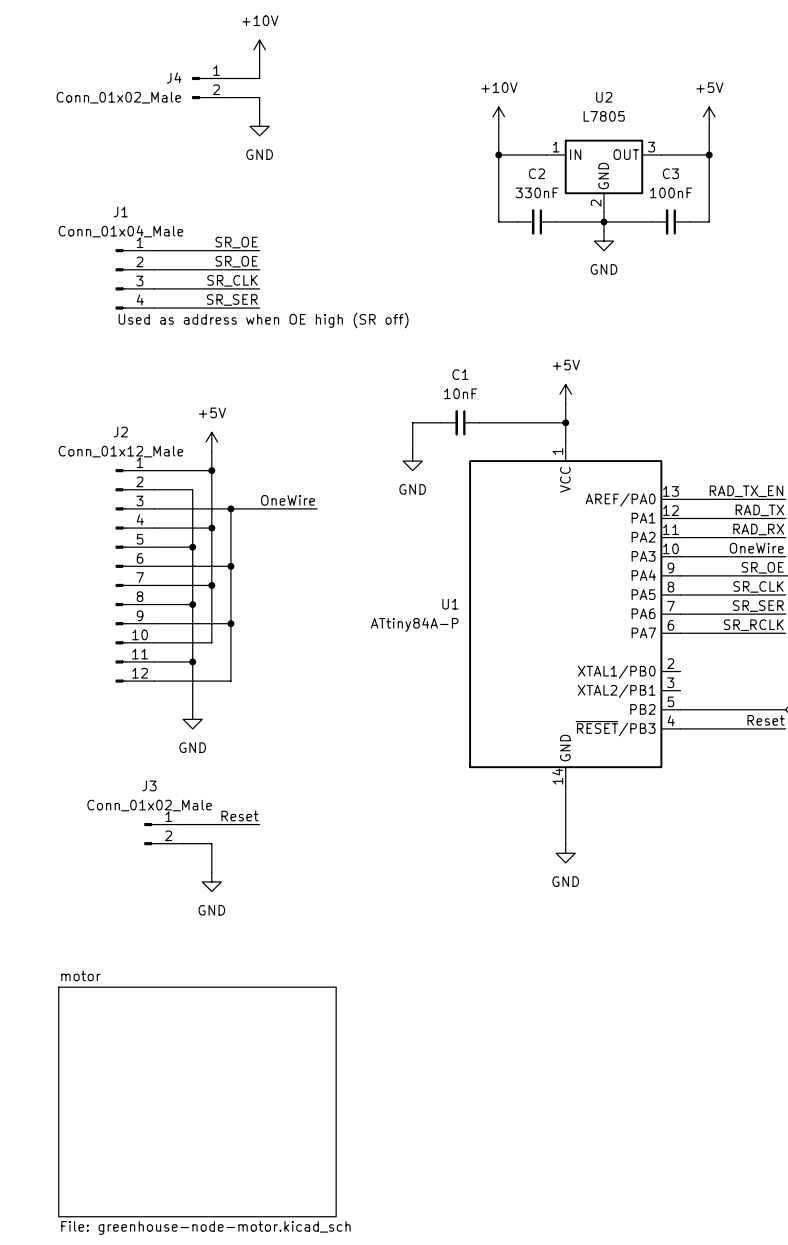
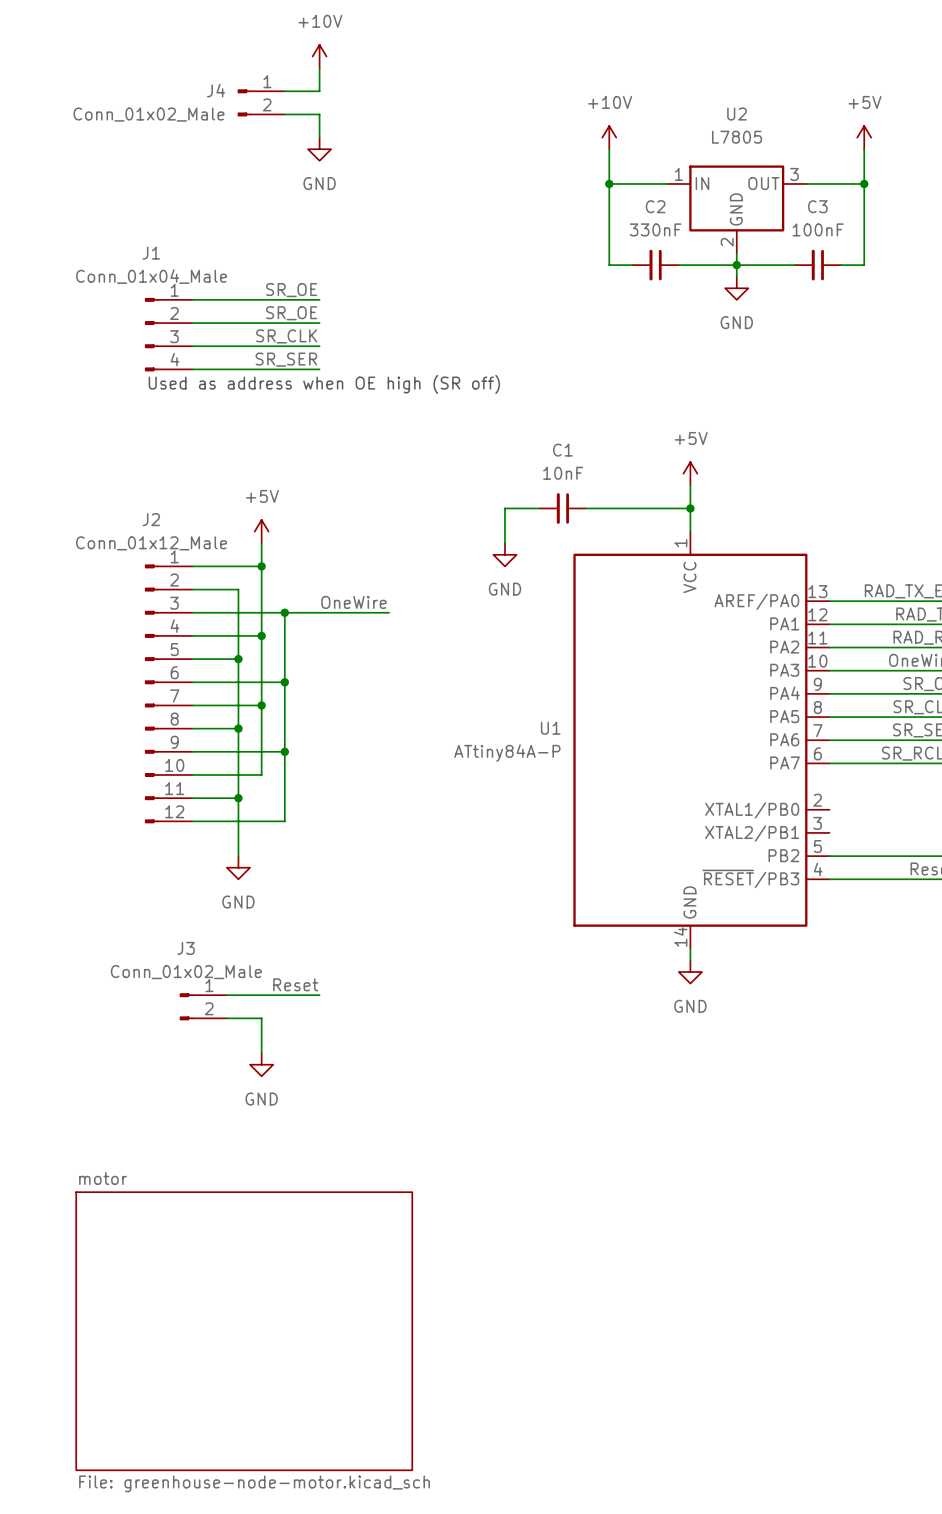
wire: (565, 795) (565, 843) -> none
power symbol position: GND (565, 853) -> GND (690, 972)

